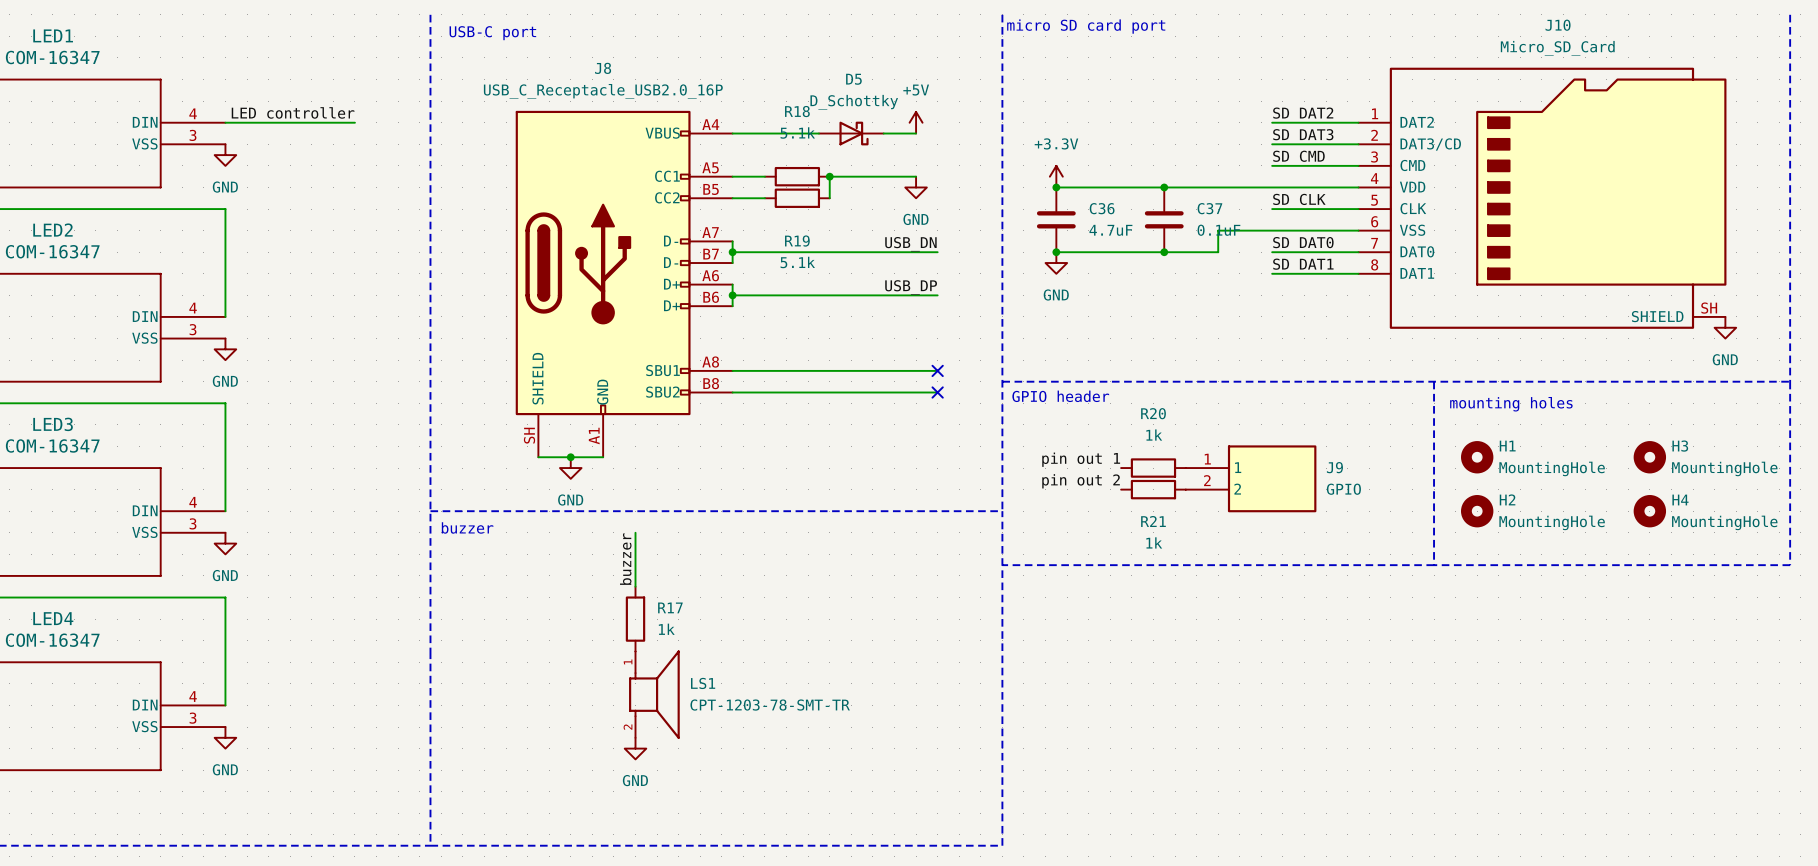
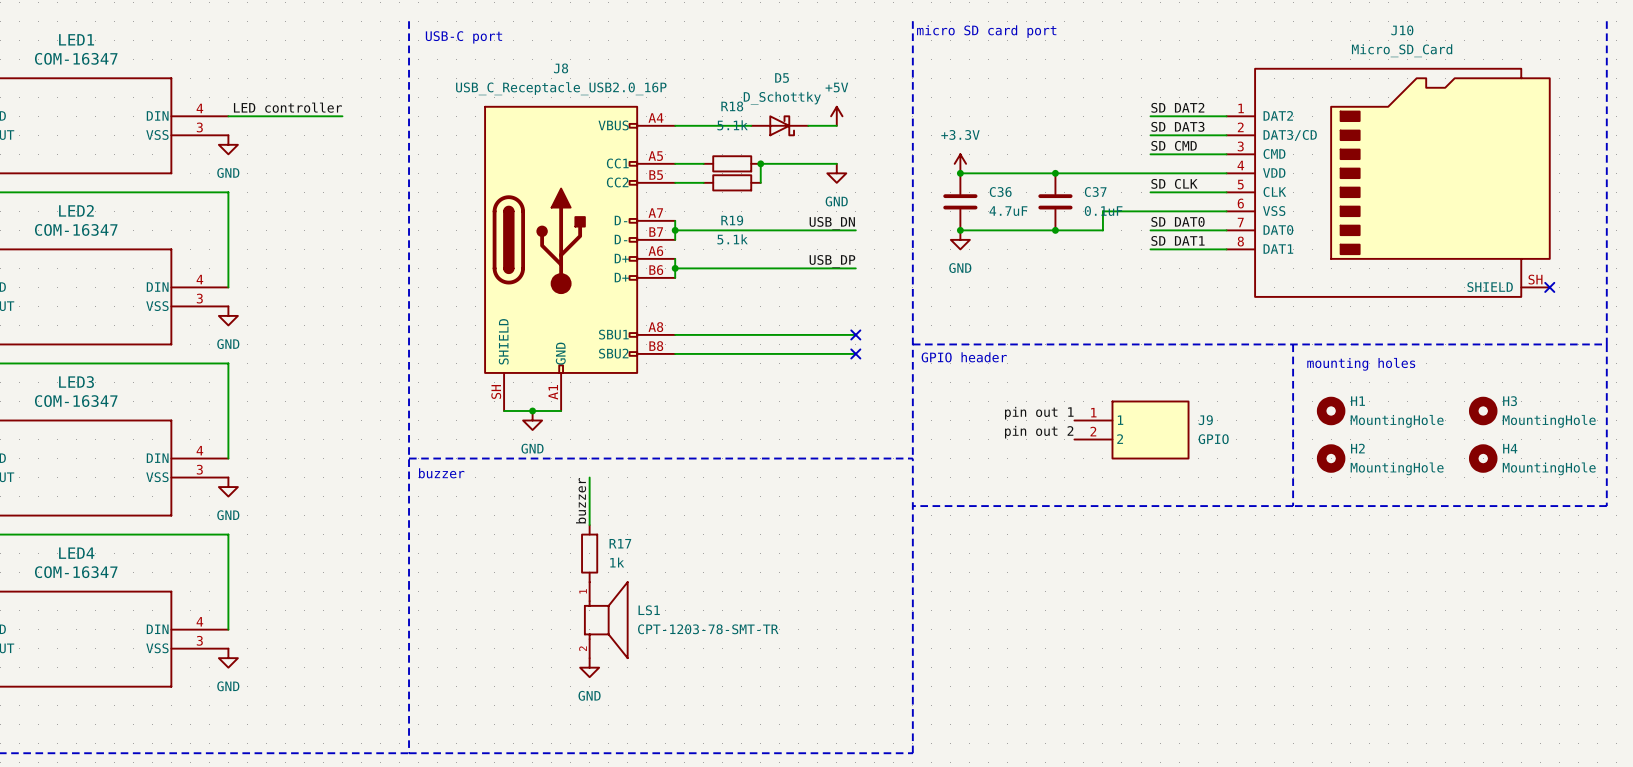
no-connect mark: none -> (1549, 287)
power symbol: GND (1725, 327) -> none
label position: pin out 1 (1081, 459) -> pin out 1 (1039, 413)
R20: 1k (1153, 468) -> none
label position: pin out 2 (1081, 481) -> pin out 2 (1039, 432)
R21: 1k (1153, 489) -> none

